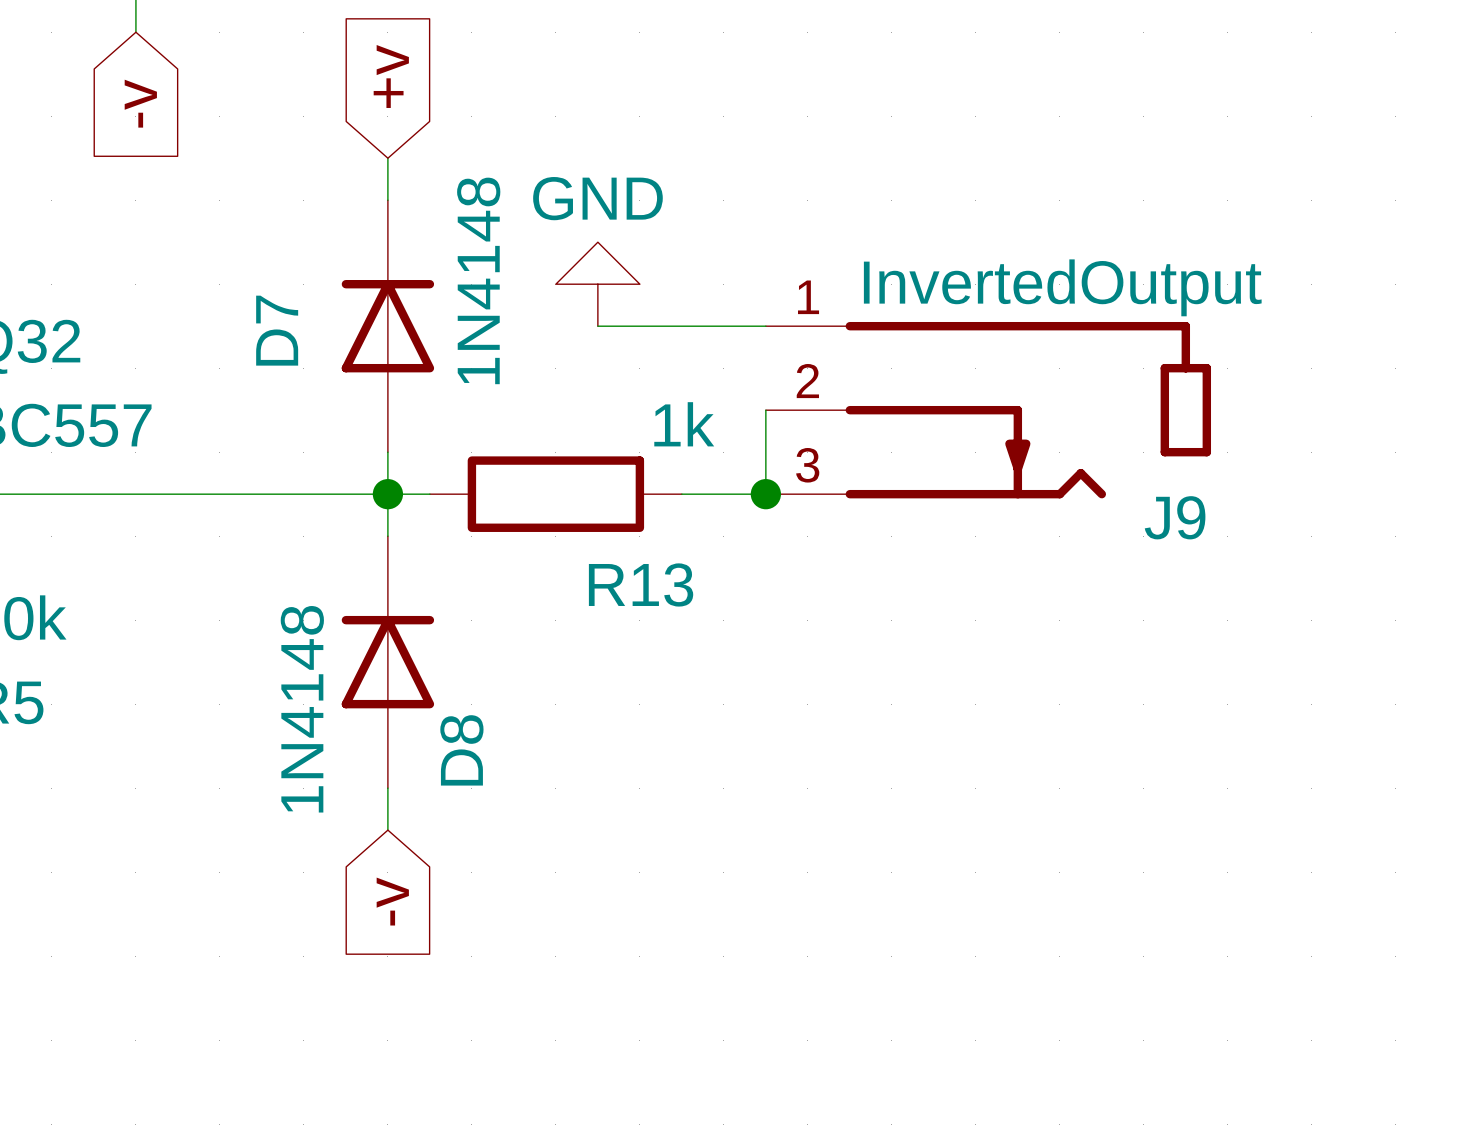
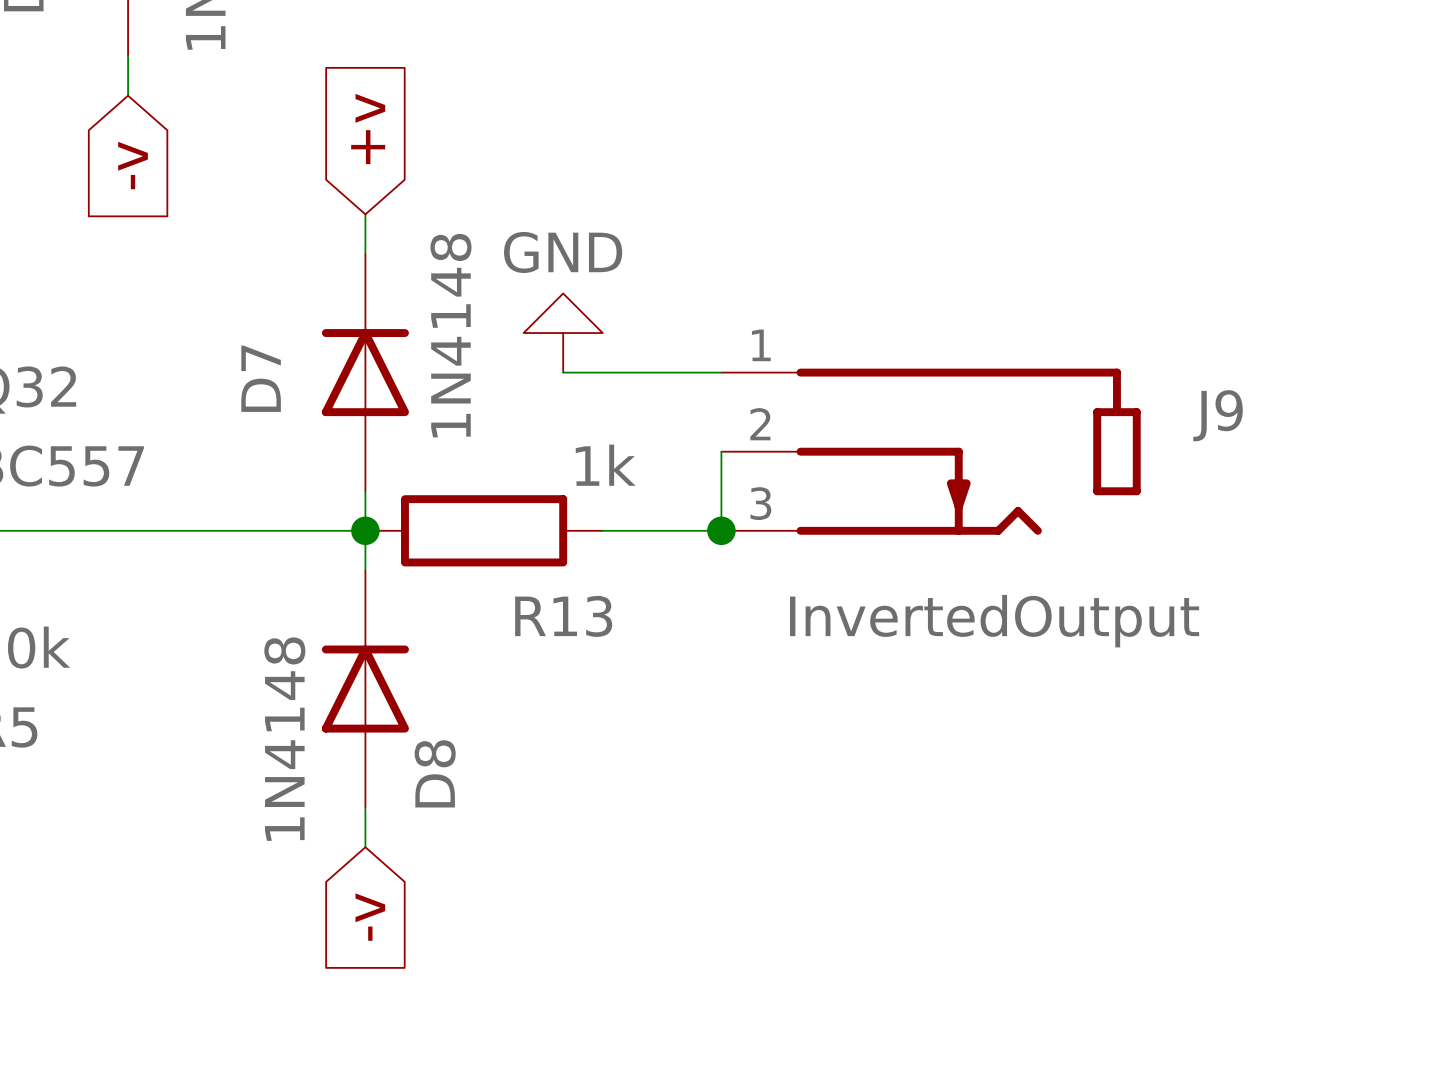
J9 value position: InvertedOutput (1062, 287) -> InvertedOutput (994, 621)
R13 position: (555, 494) -> (484, 530)
J9 name position: J9 (1175, 517) -> J9 (1218, 415)

